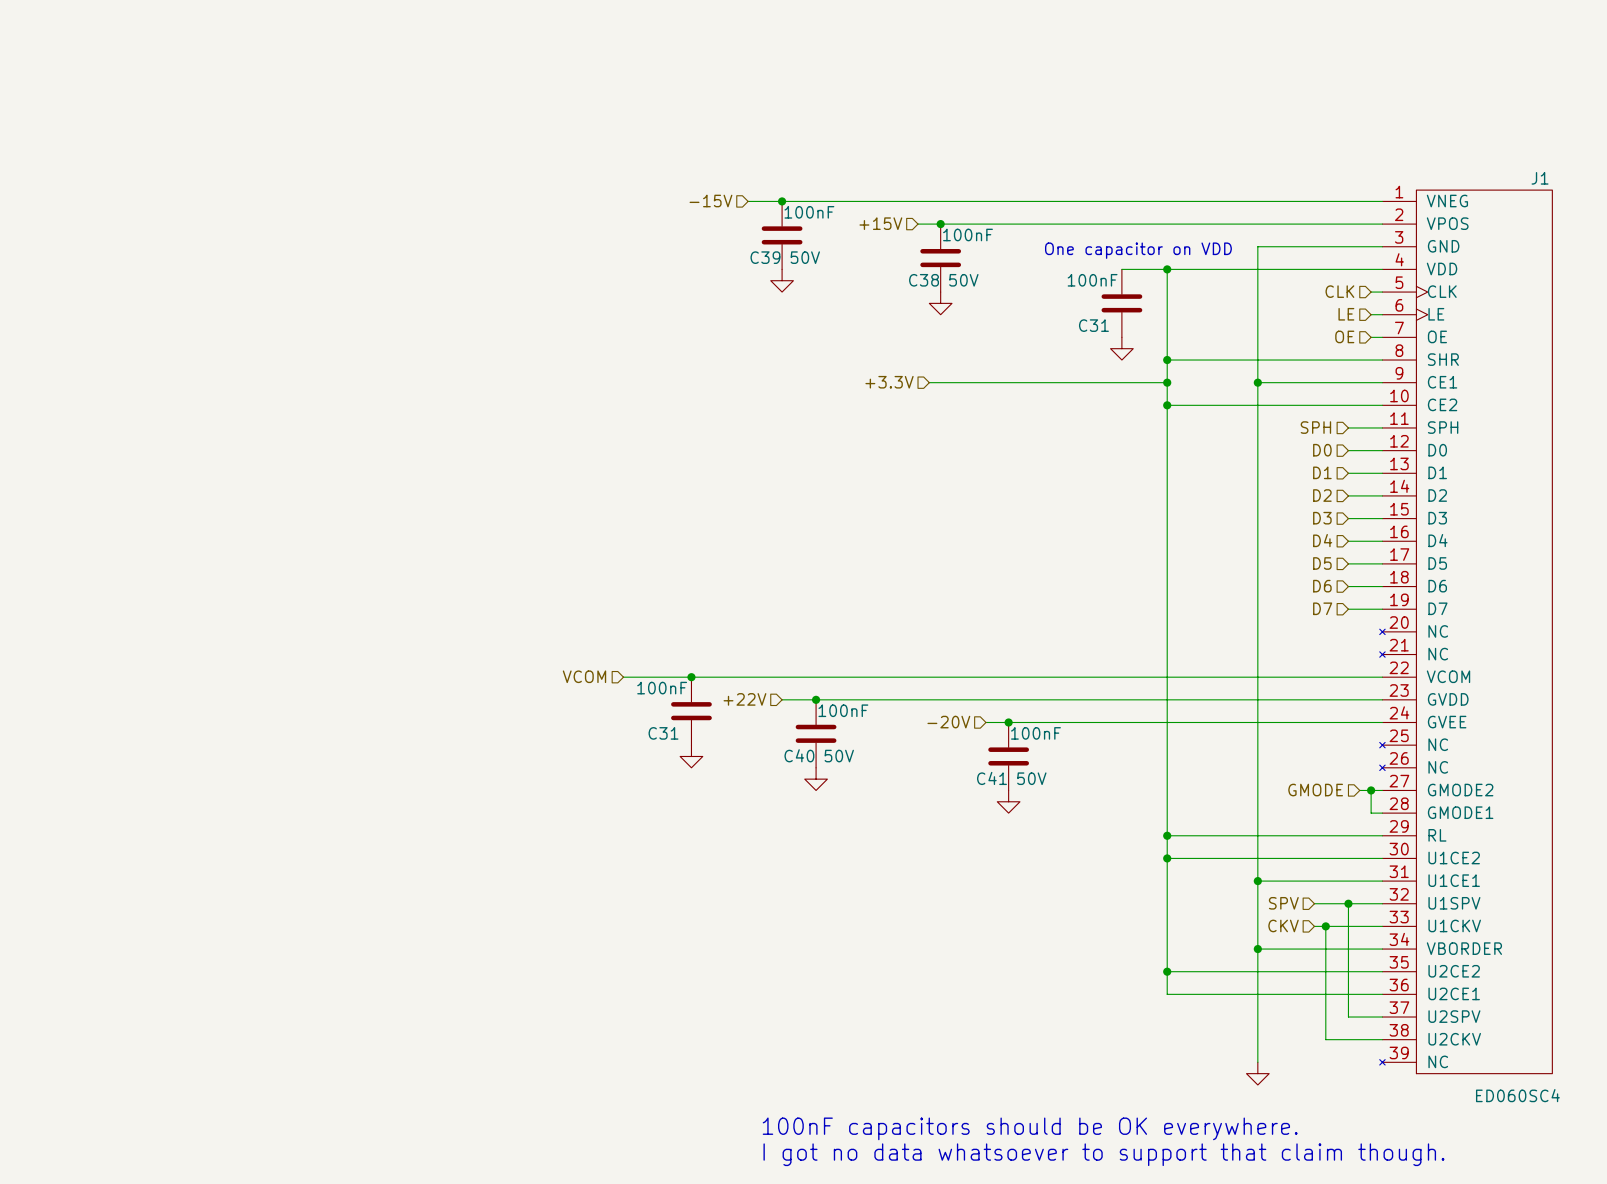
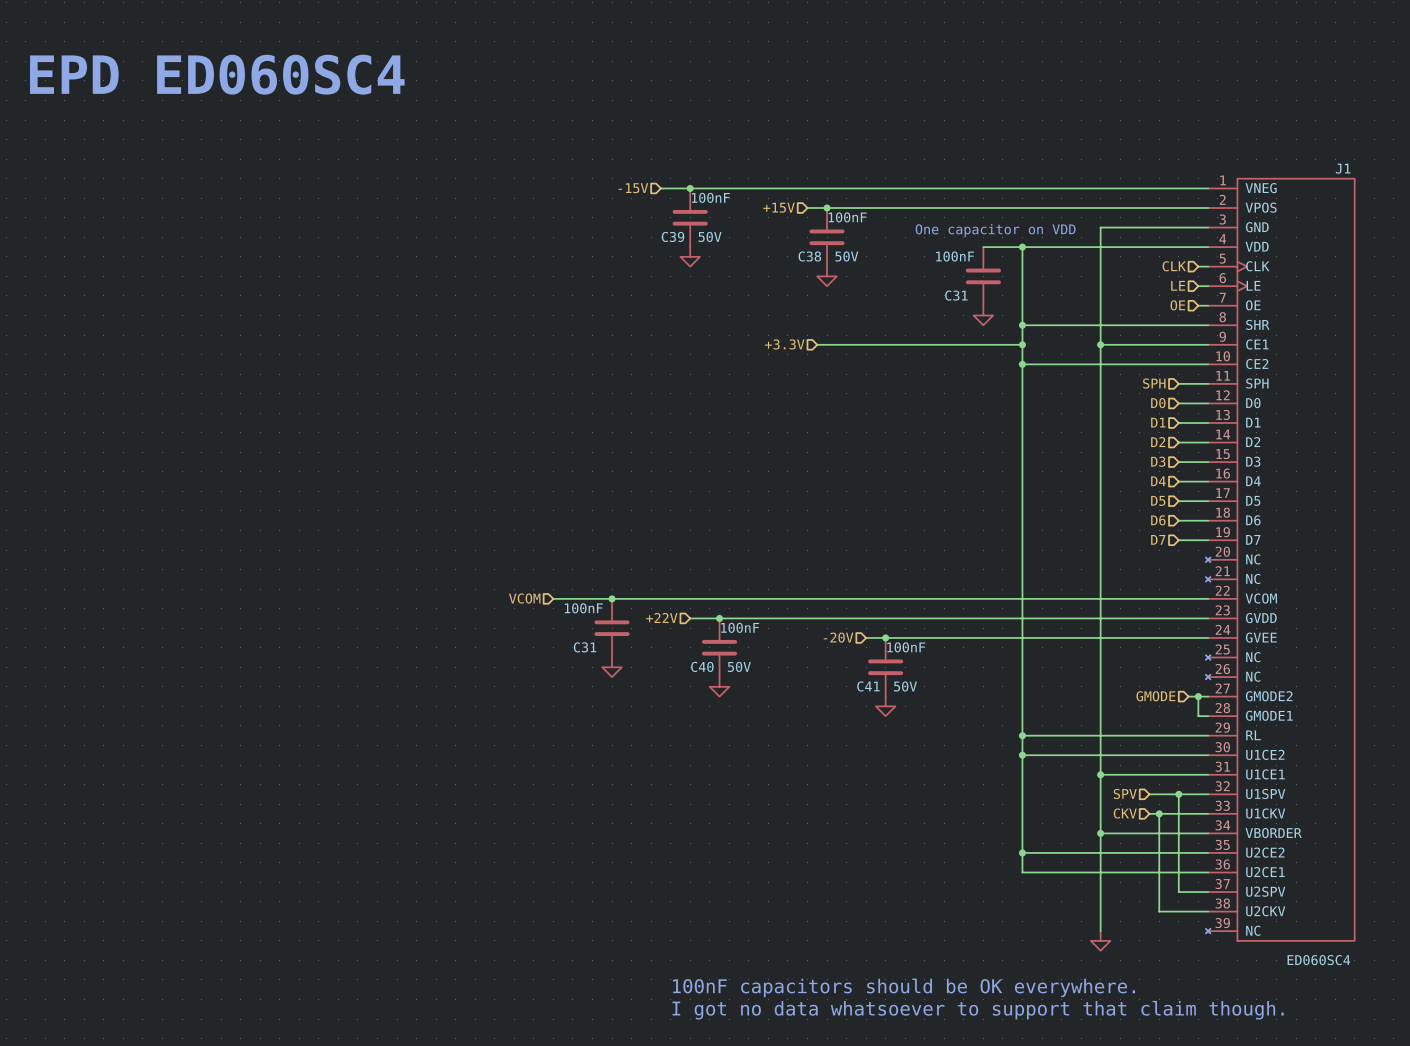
text: none -> EPD ED060SC4 (217, 74)

